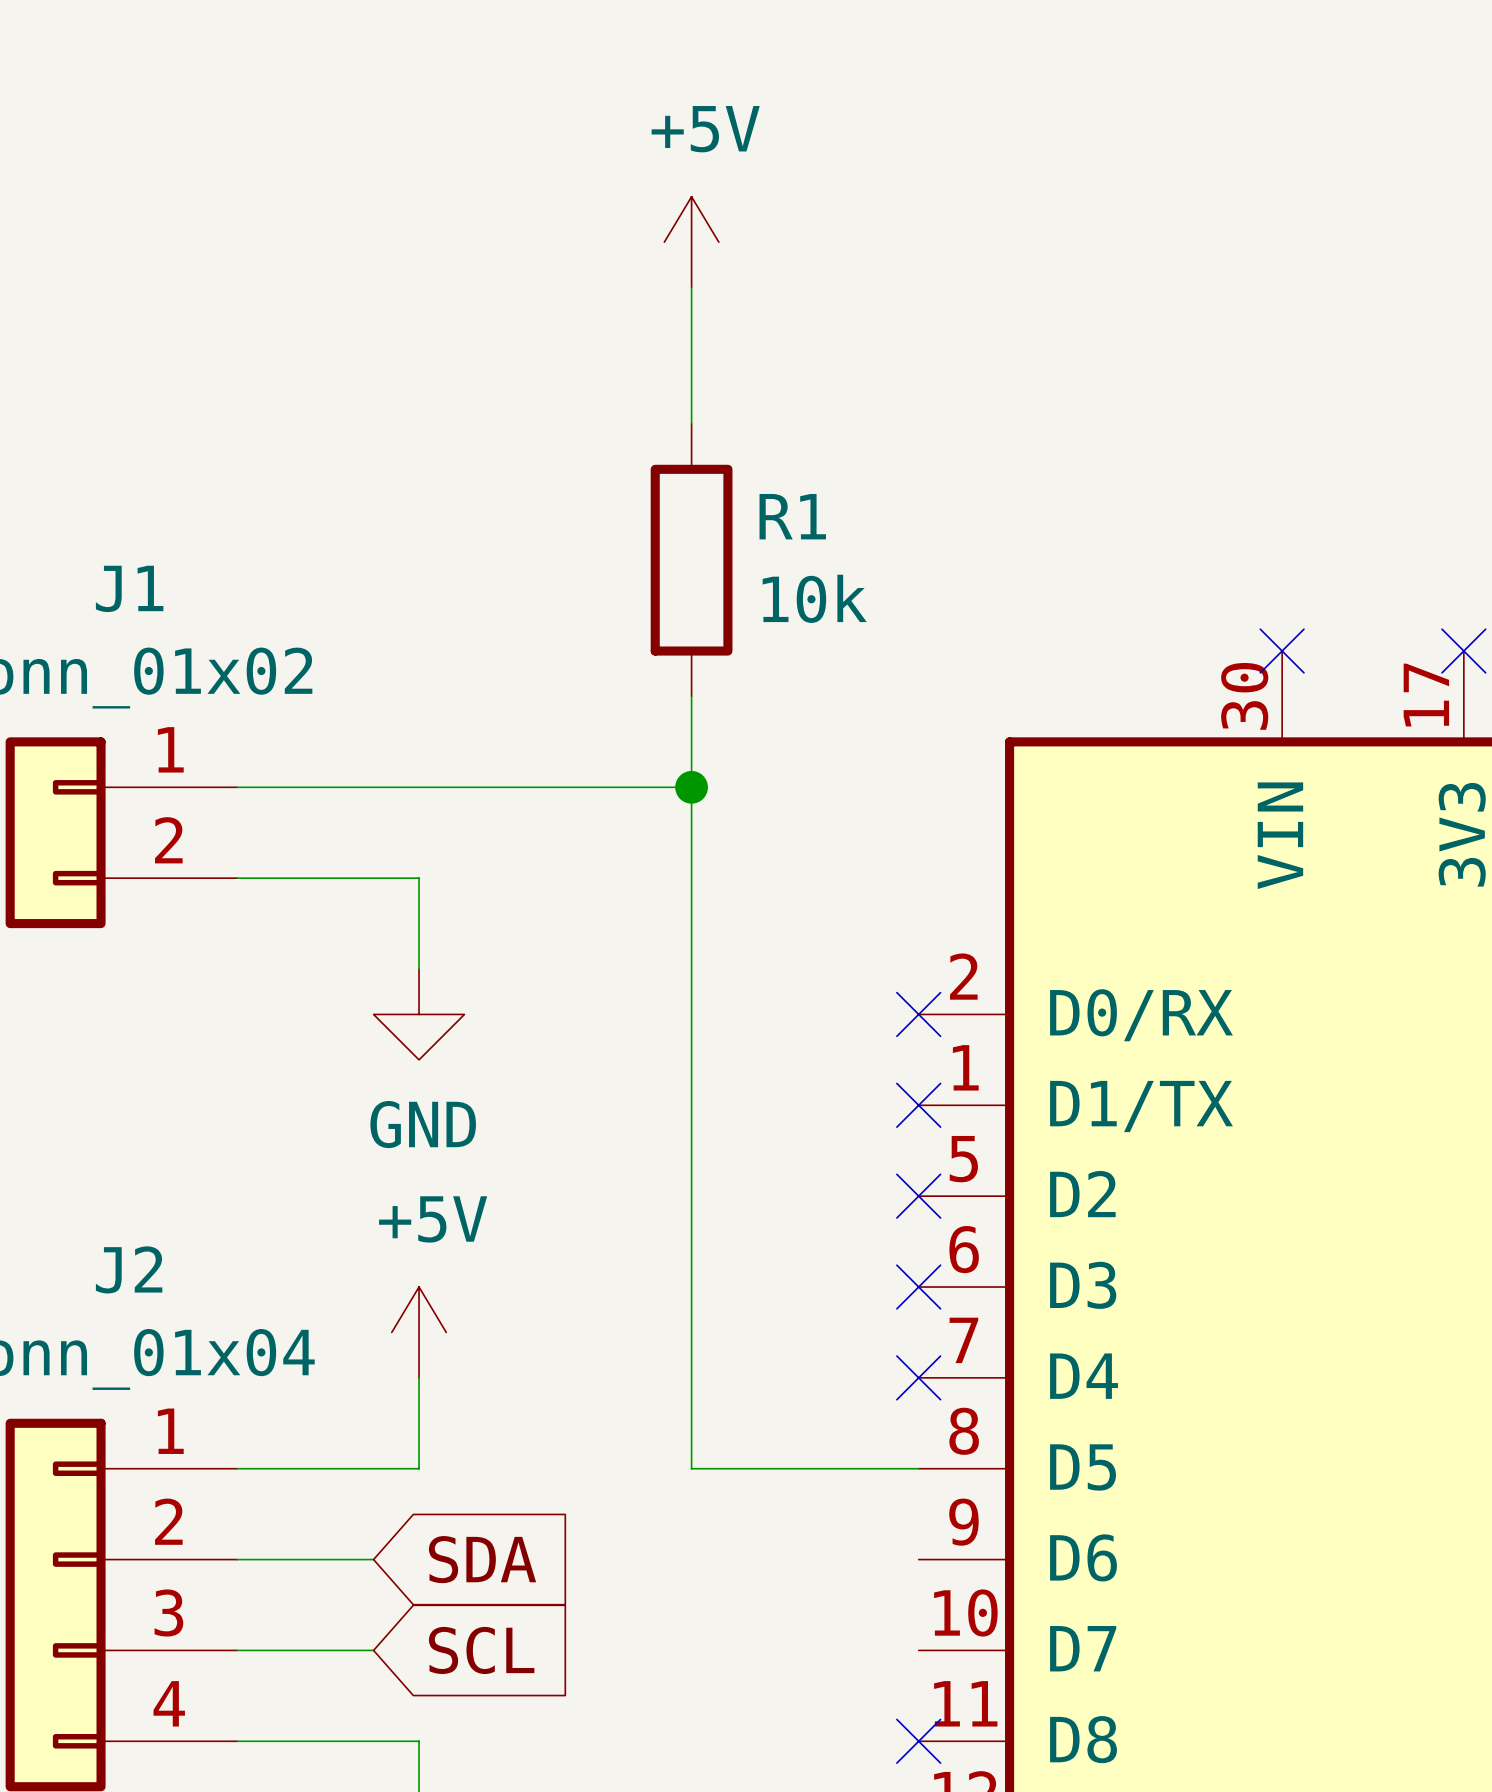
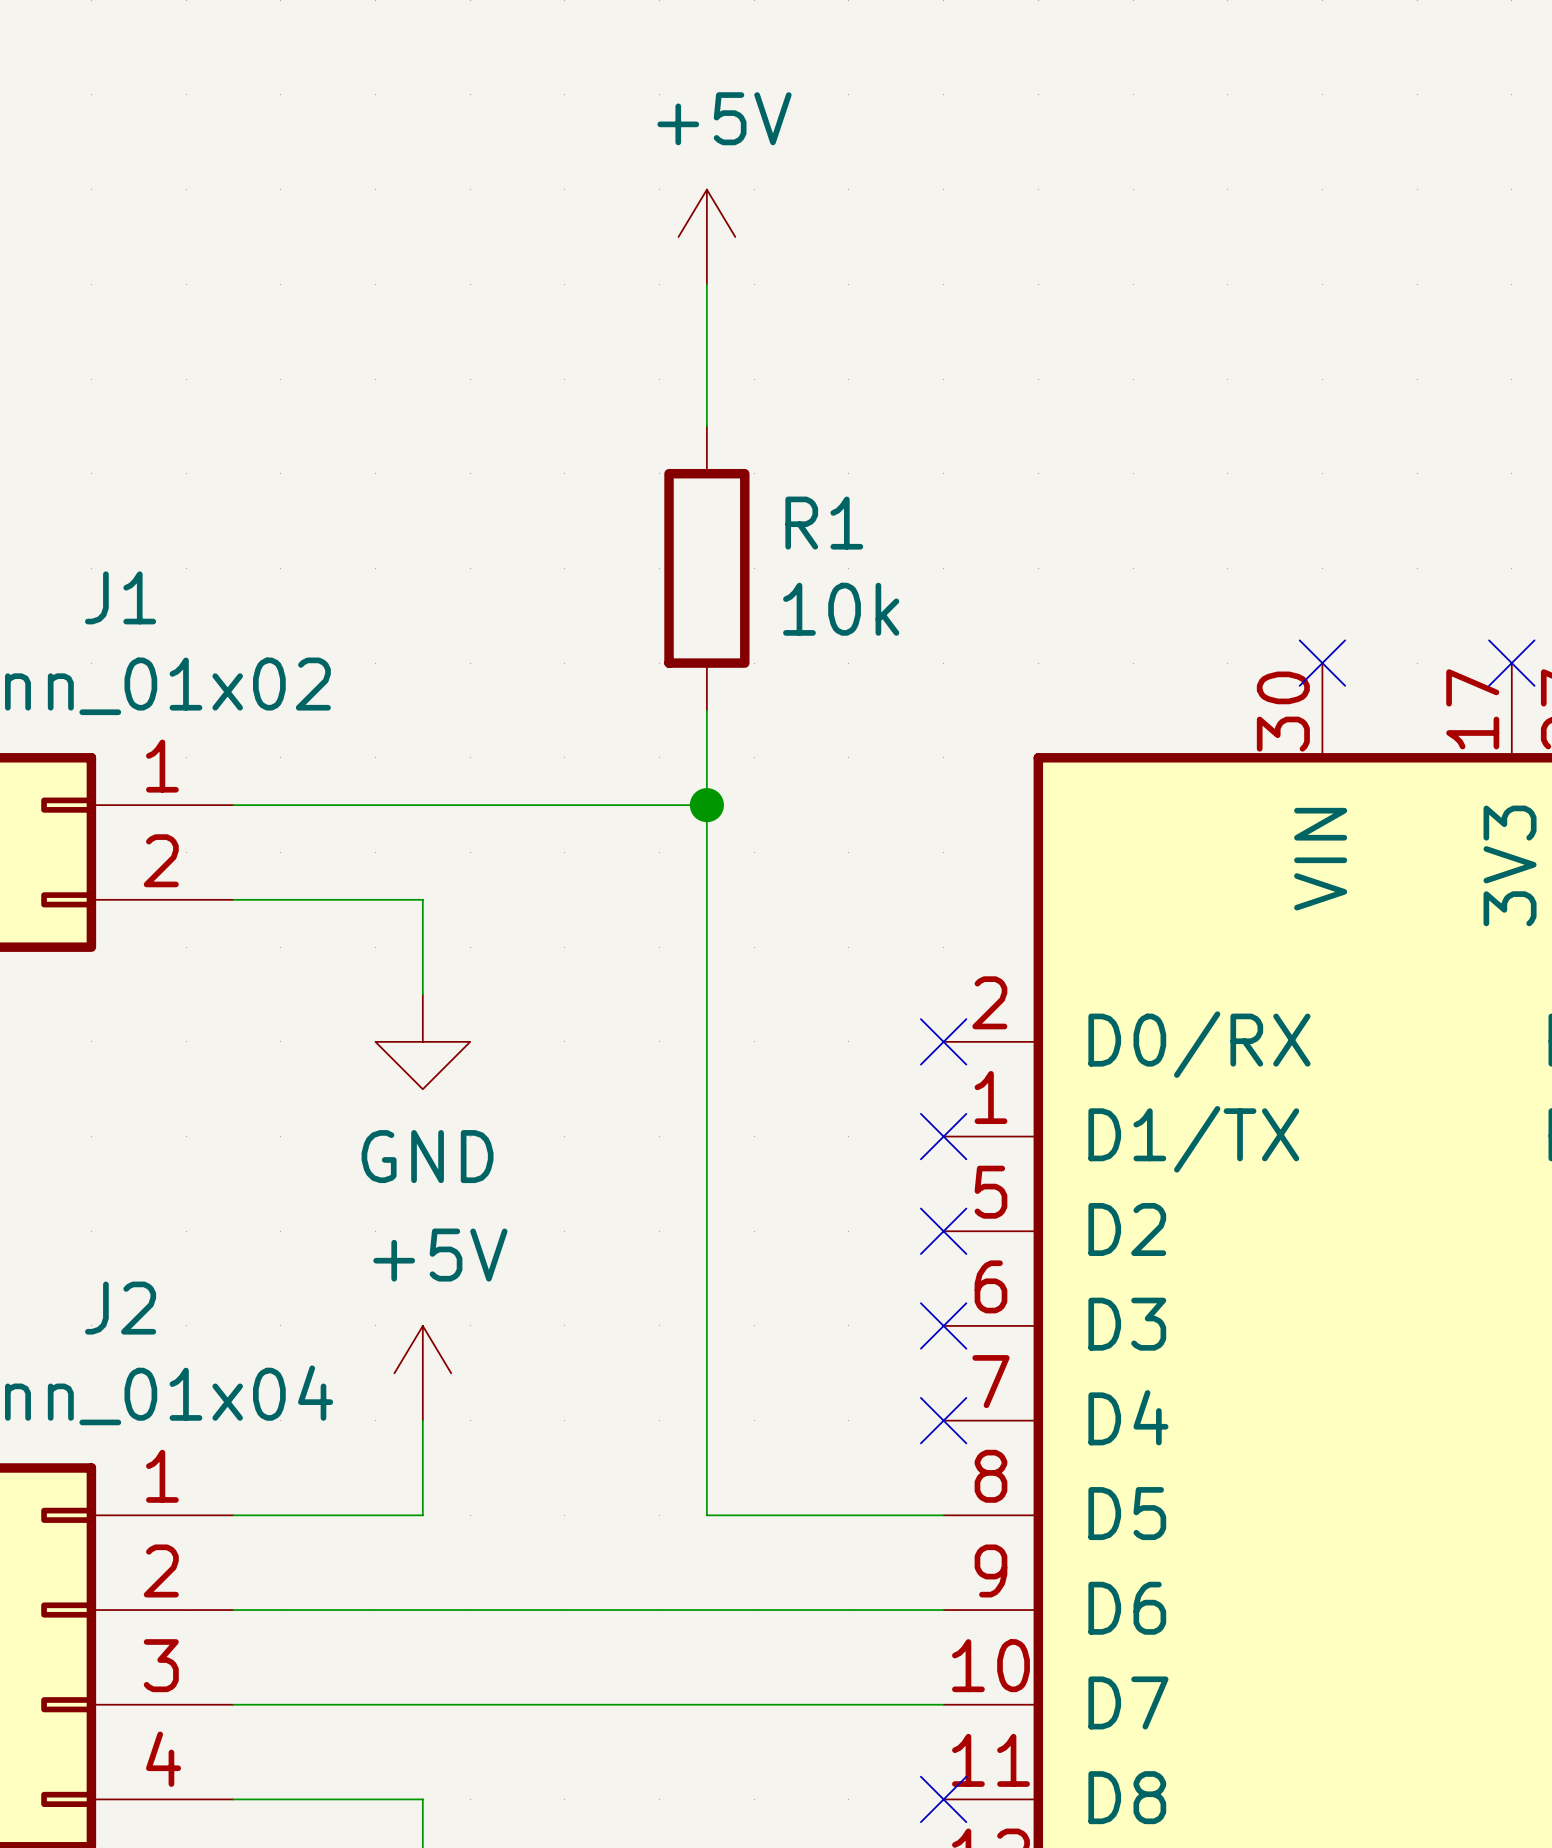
wire: none -> (375, 1610) (943, 1610)
global label: SDA (482, 1559) -> none
wire: none -> (375, 1704) (943, 1704)
global label: SCL (481, 1650) -> none

